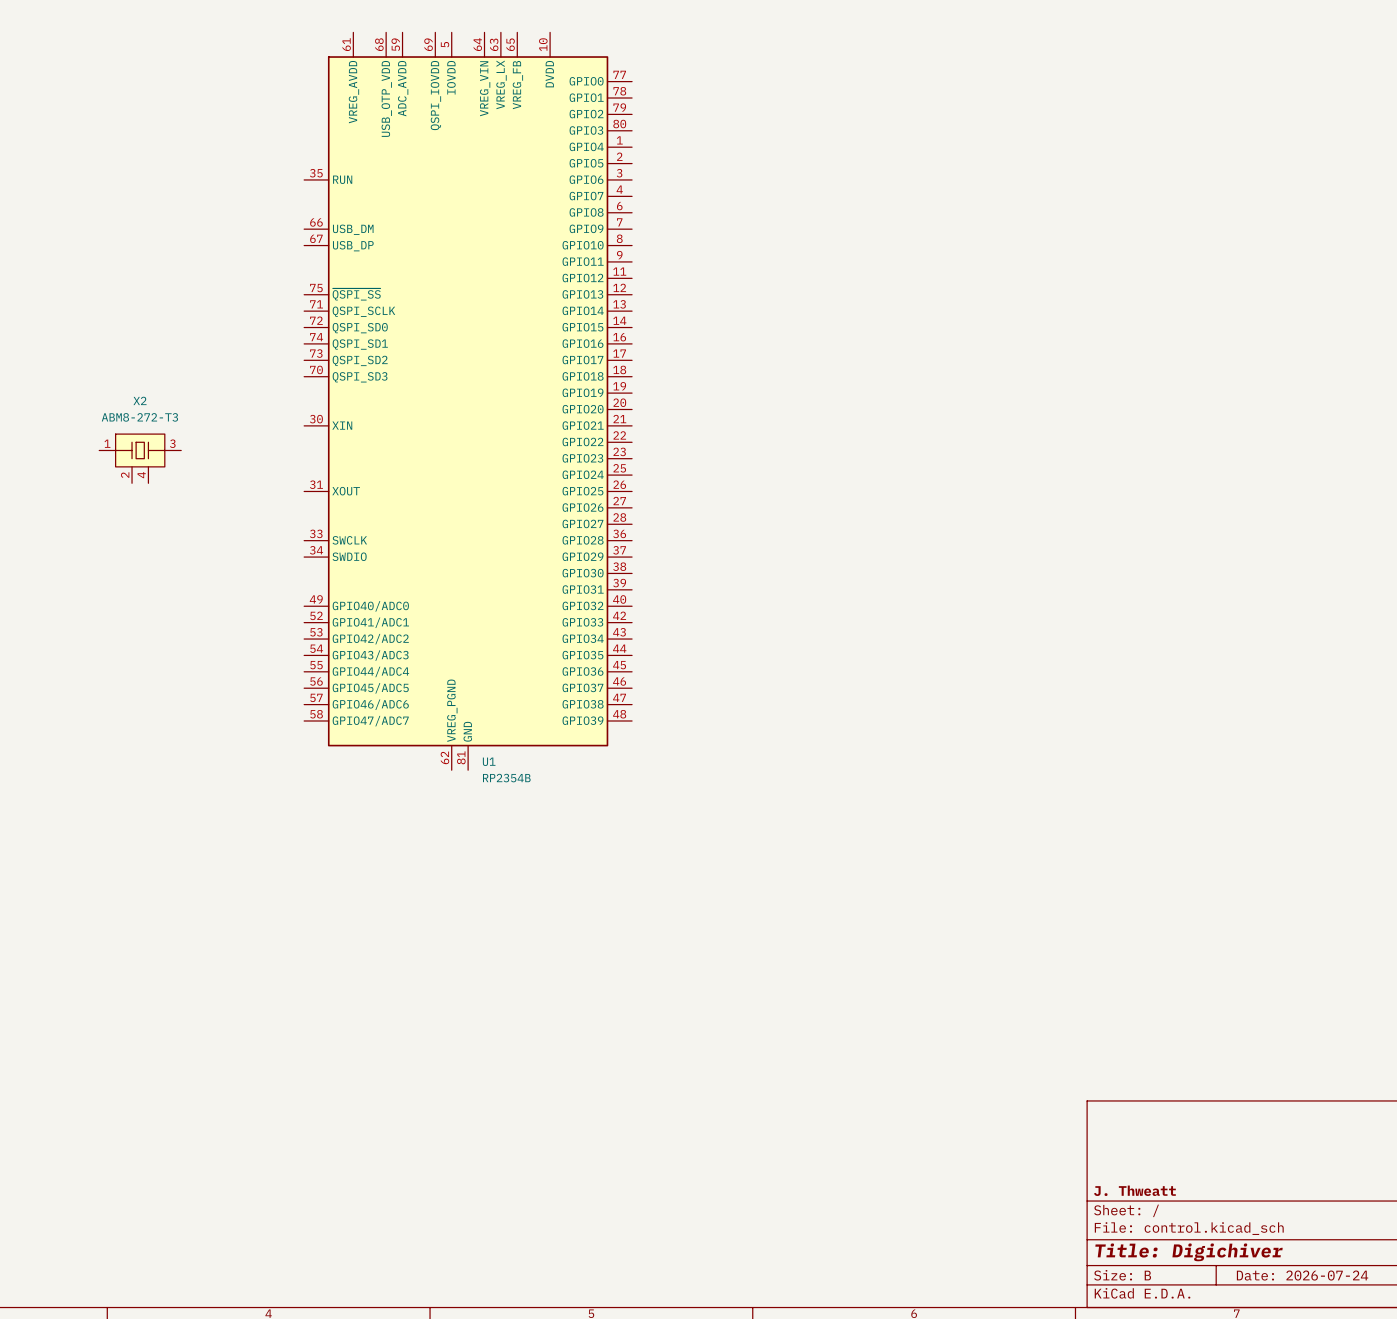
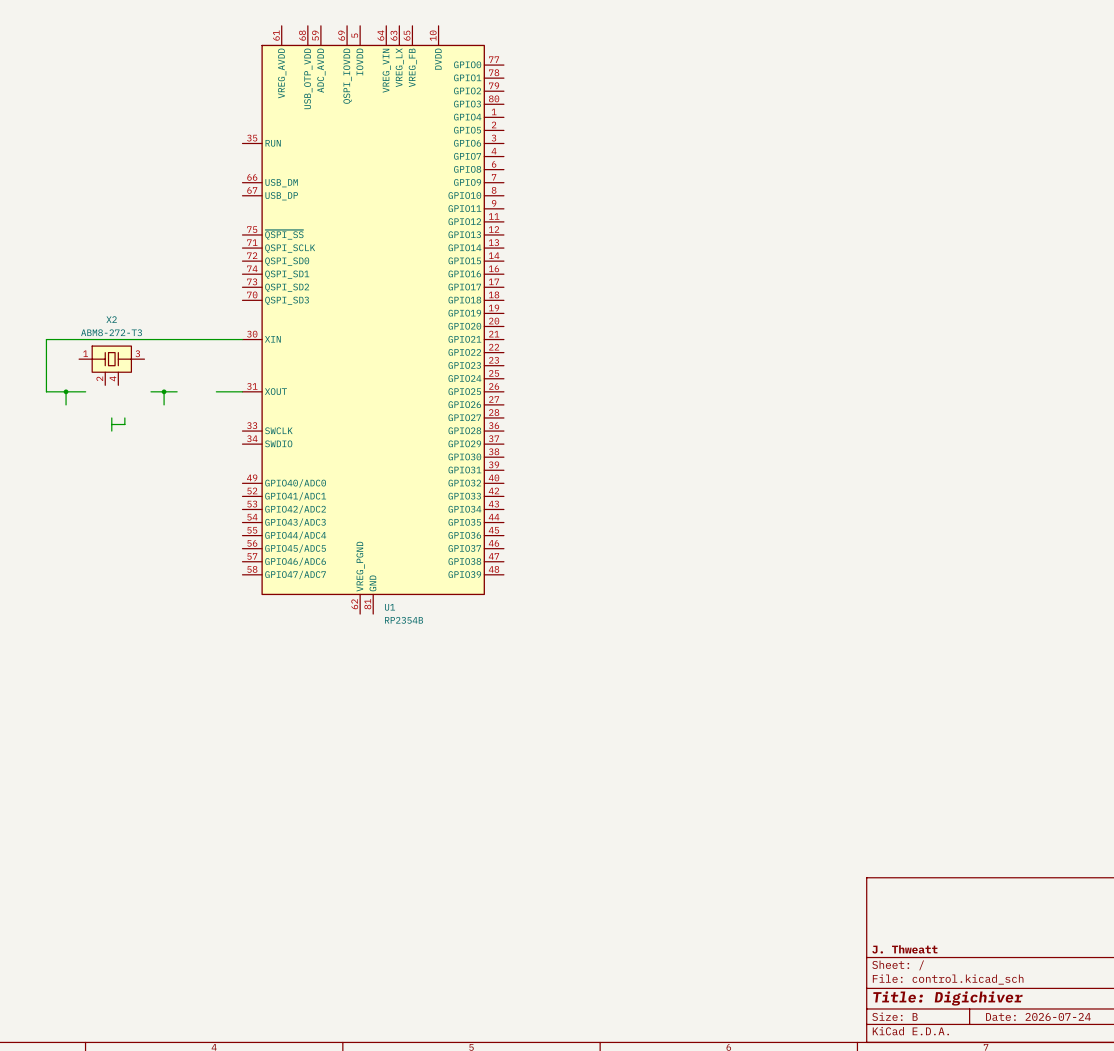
wire: none -> (242, 339) (46, 339) (46, 391) (85, 391)
wire: none -> (66, 391) (66, 404)
junction: none -> (66, 391)
wire: none -> (151, 391) (177, 391)
wire: none -> (164, 391) (164, 404)
junction: none -> (164, 391)
wire: none -> (216, 391) (242, 391)
wire: none -> (111, 417) (111, 431)
wire: none -> (124, 417) (124, 424) (111, 424)

